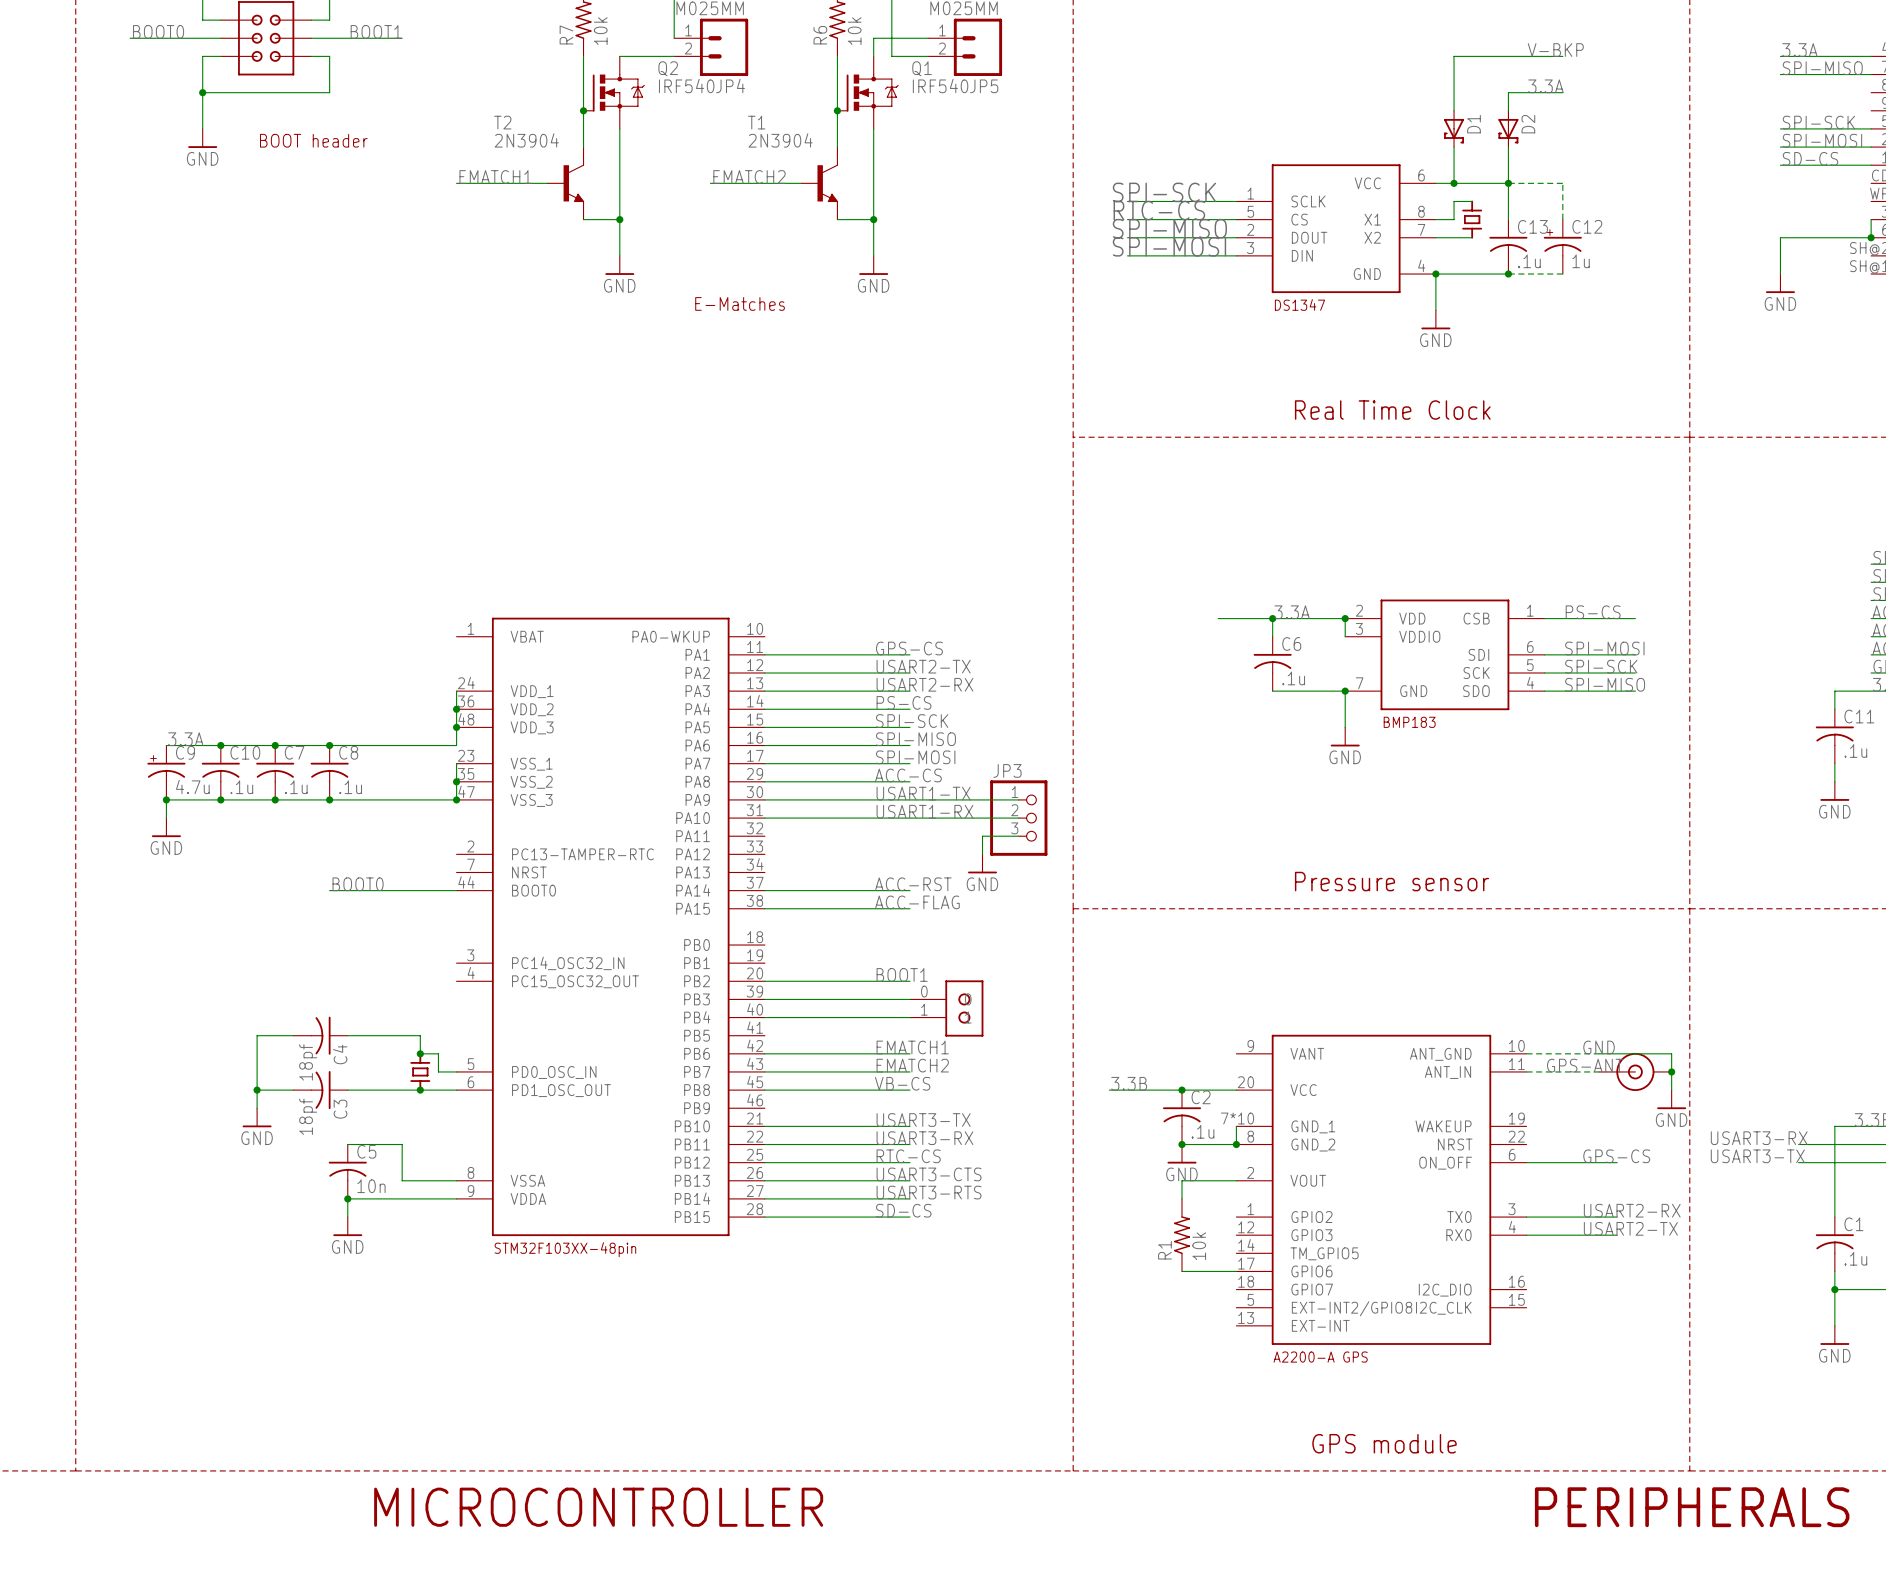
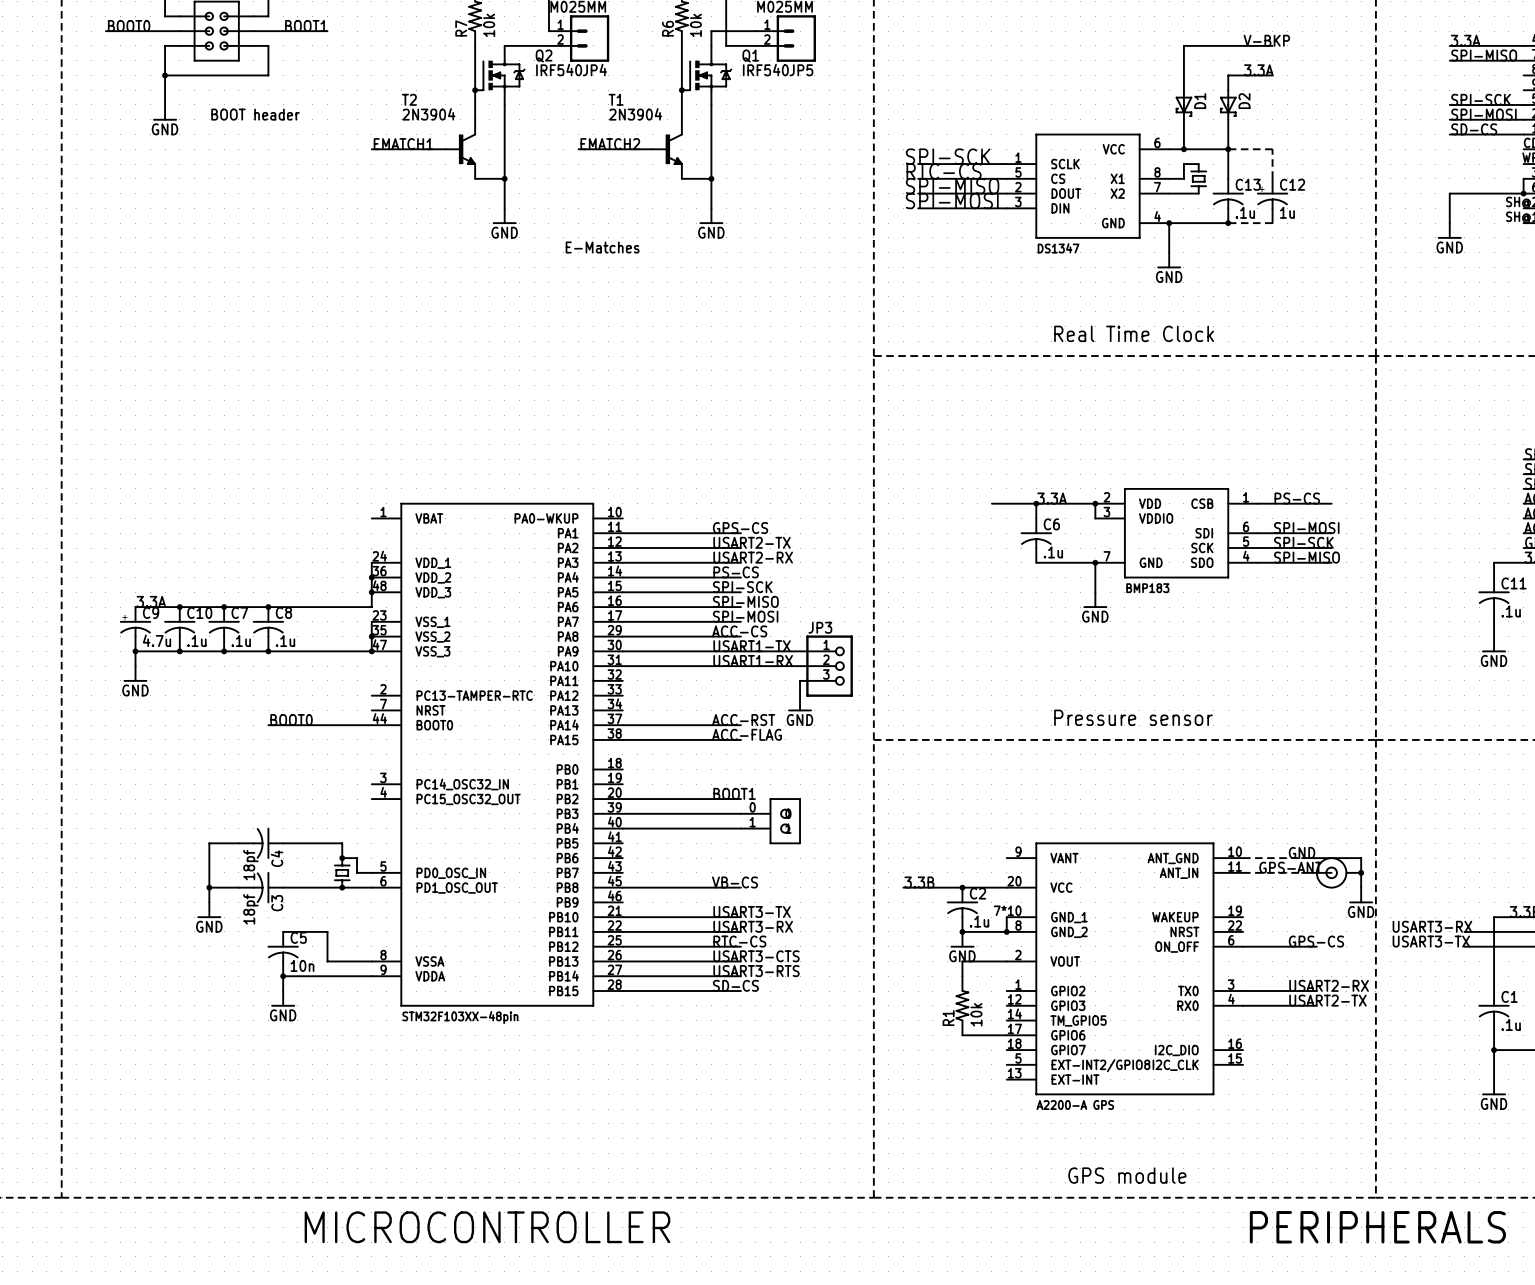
label: EMATCH1 (912, 1047) -> none
wire: (764, 1053) (909, 1053) -> none
label: EMATCH2 (912, 1065) -> none
wire: (764, 1071) (909, 1071) -> none

